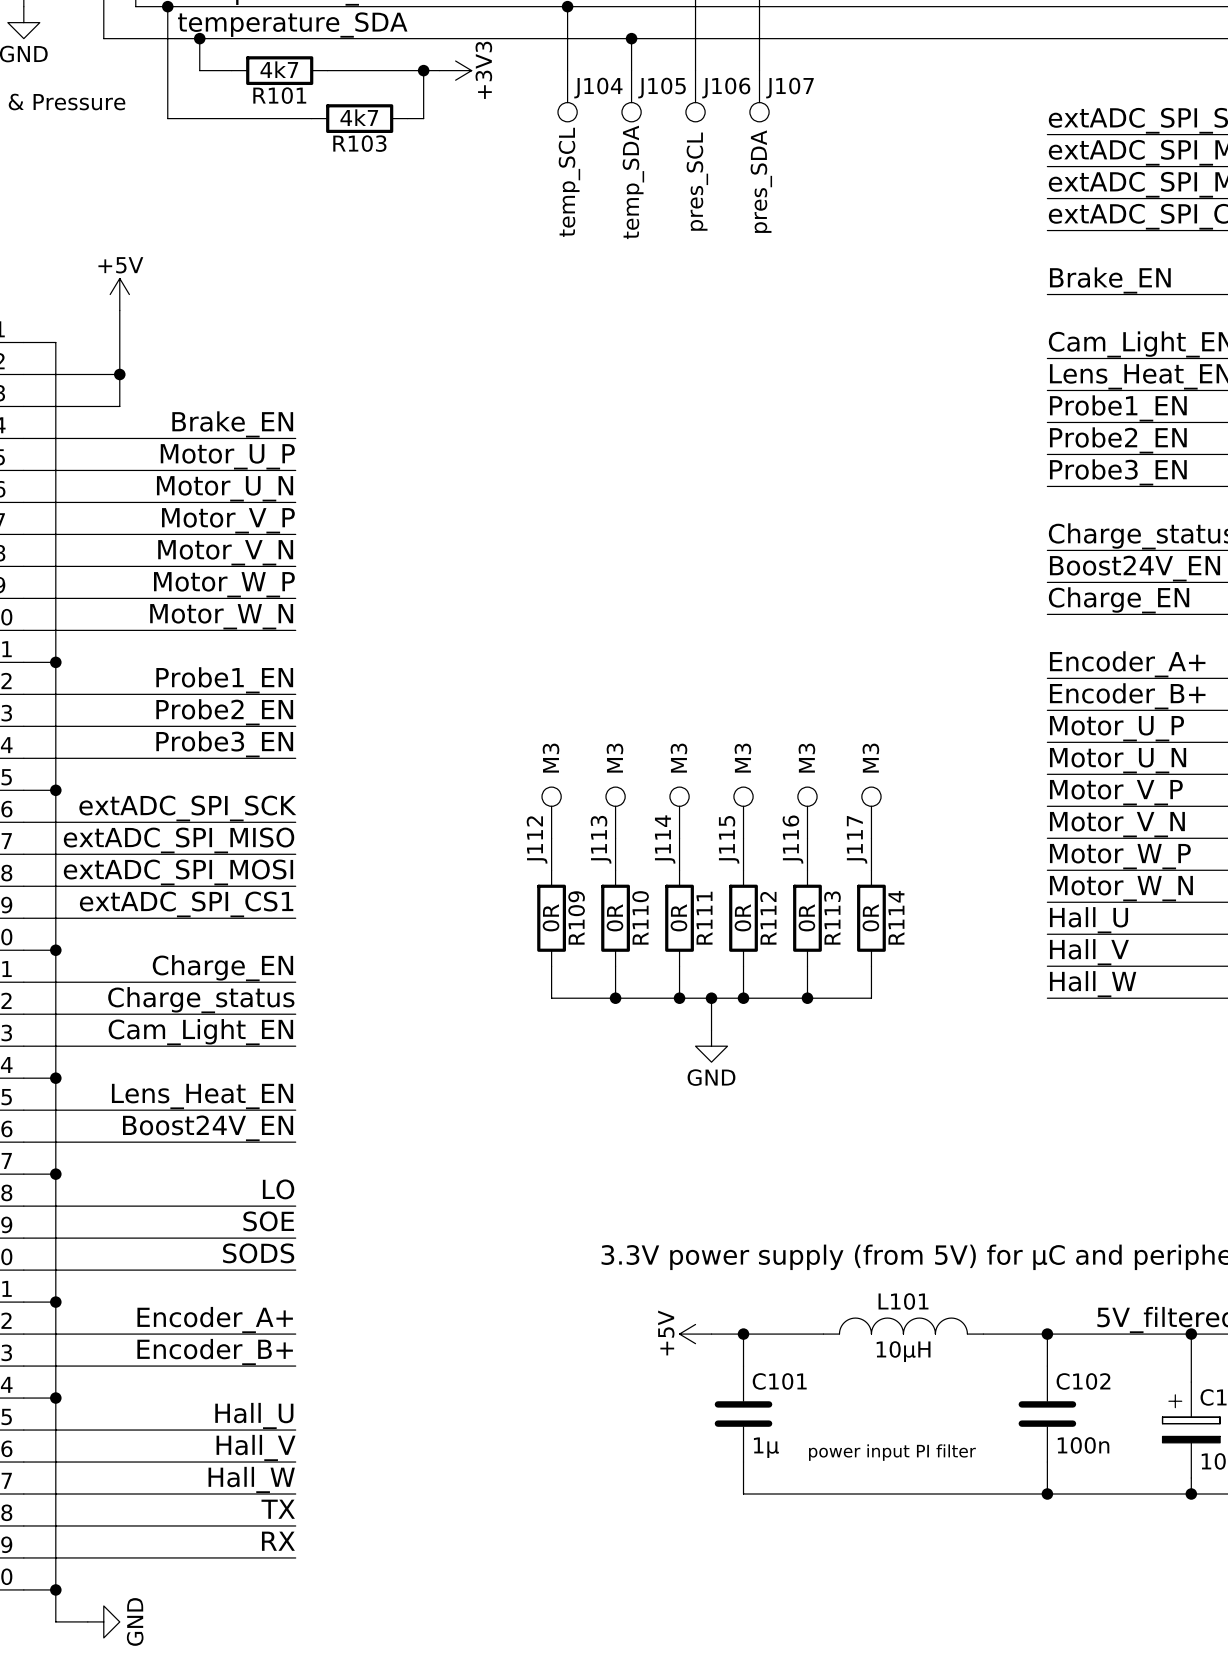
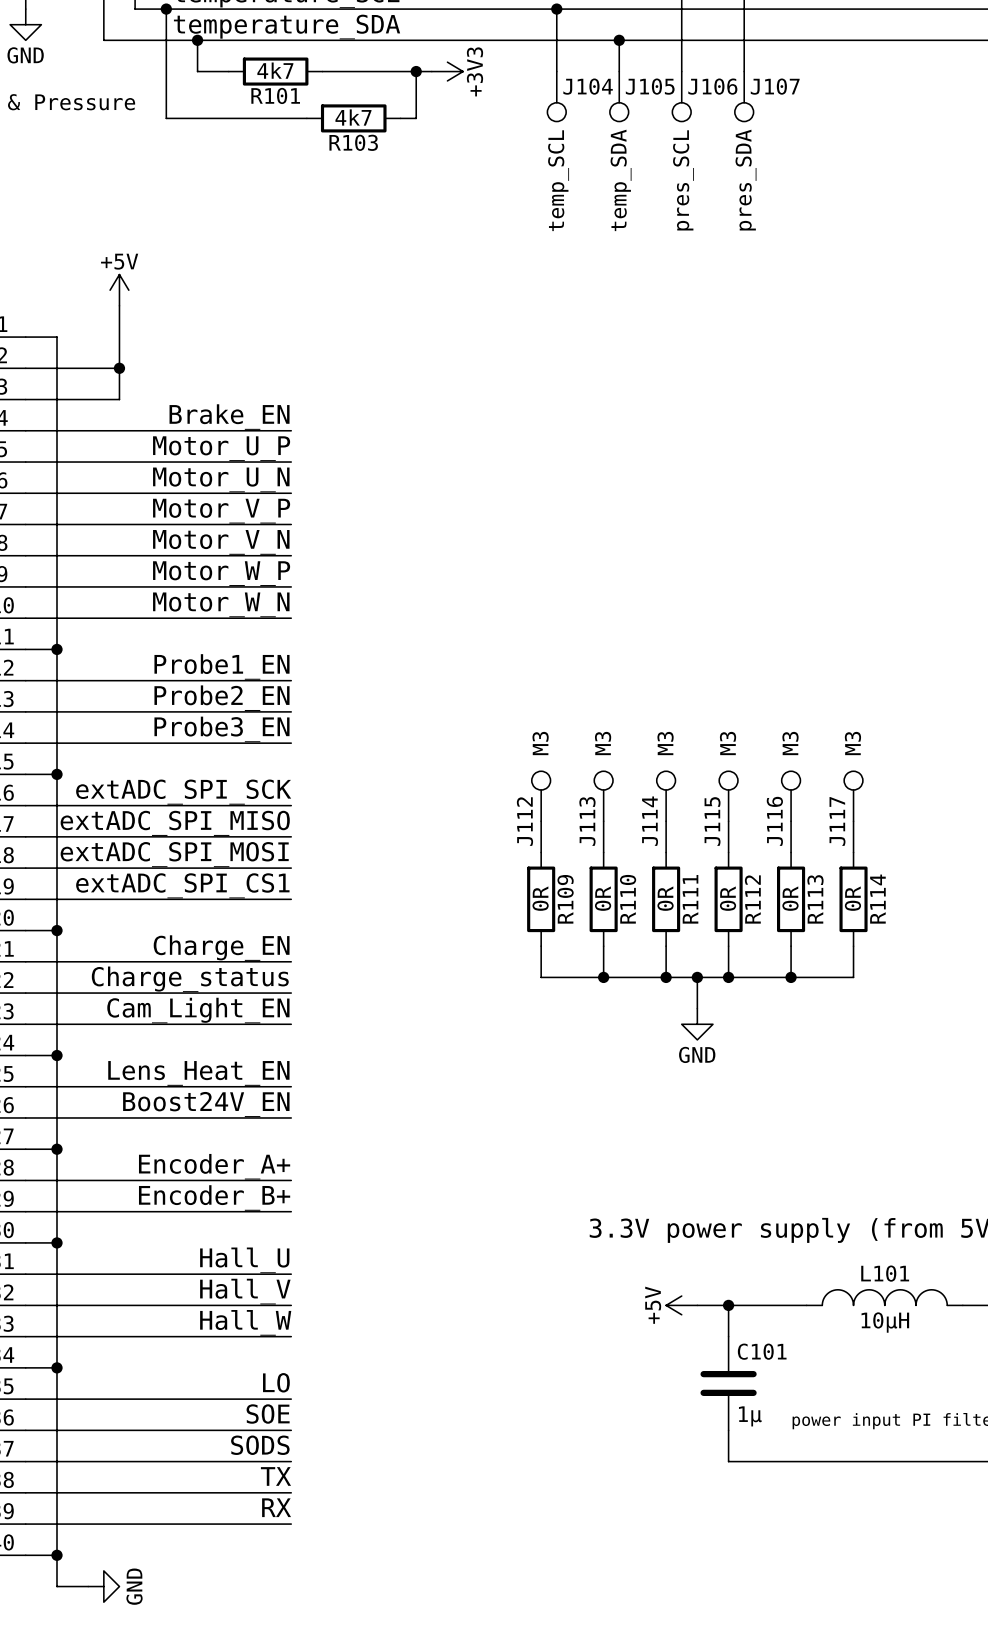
label: LO (278, 1189) -> Encoder_A+ (214, 1166)
label: SOE (268, 1221) -> Encoder_B+ (214, 1197)
label: SODS (258, 1253) -> none
wire: (55, 1270) (295, 1270) -> (56, 1274) (291, 1274)
label: none -> Hall_U (244, 1260)
junction position: (55, 1302) -> (56, 1242)
label: Encoder_A+ (215, 1320) -> Hall_V (245, 1291)
label: Encoder_B+ (215, 1352) -> Hall_W (245, 1322)
label: Hall_U (254, 1415) -> LO (276, 1382)
label: Hall_V (256, 1447) -> SOE (268, 1414)
label: Hall_W (251, 1479) -> SODS (260, 1445)

